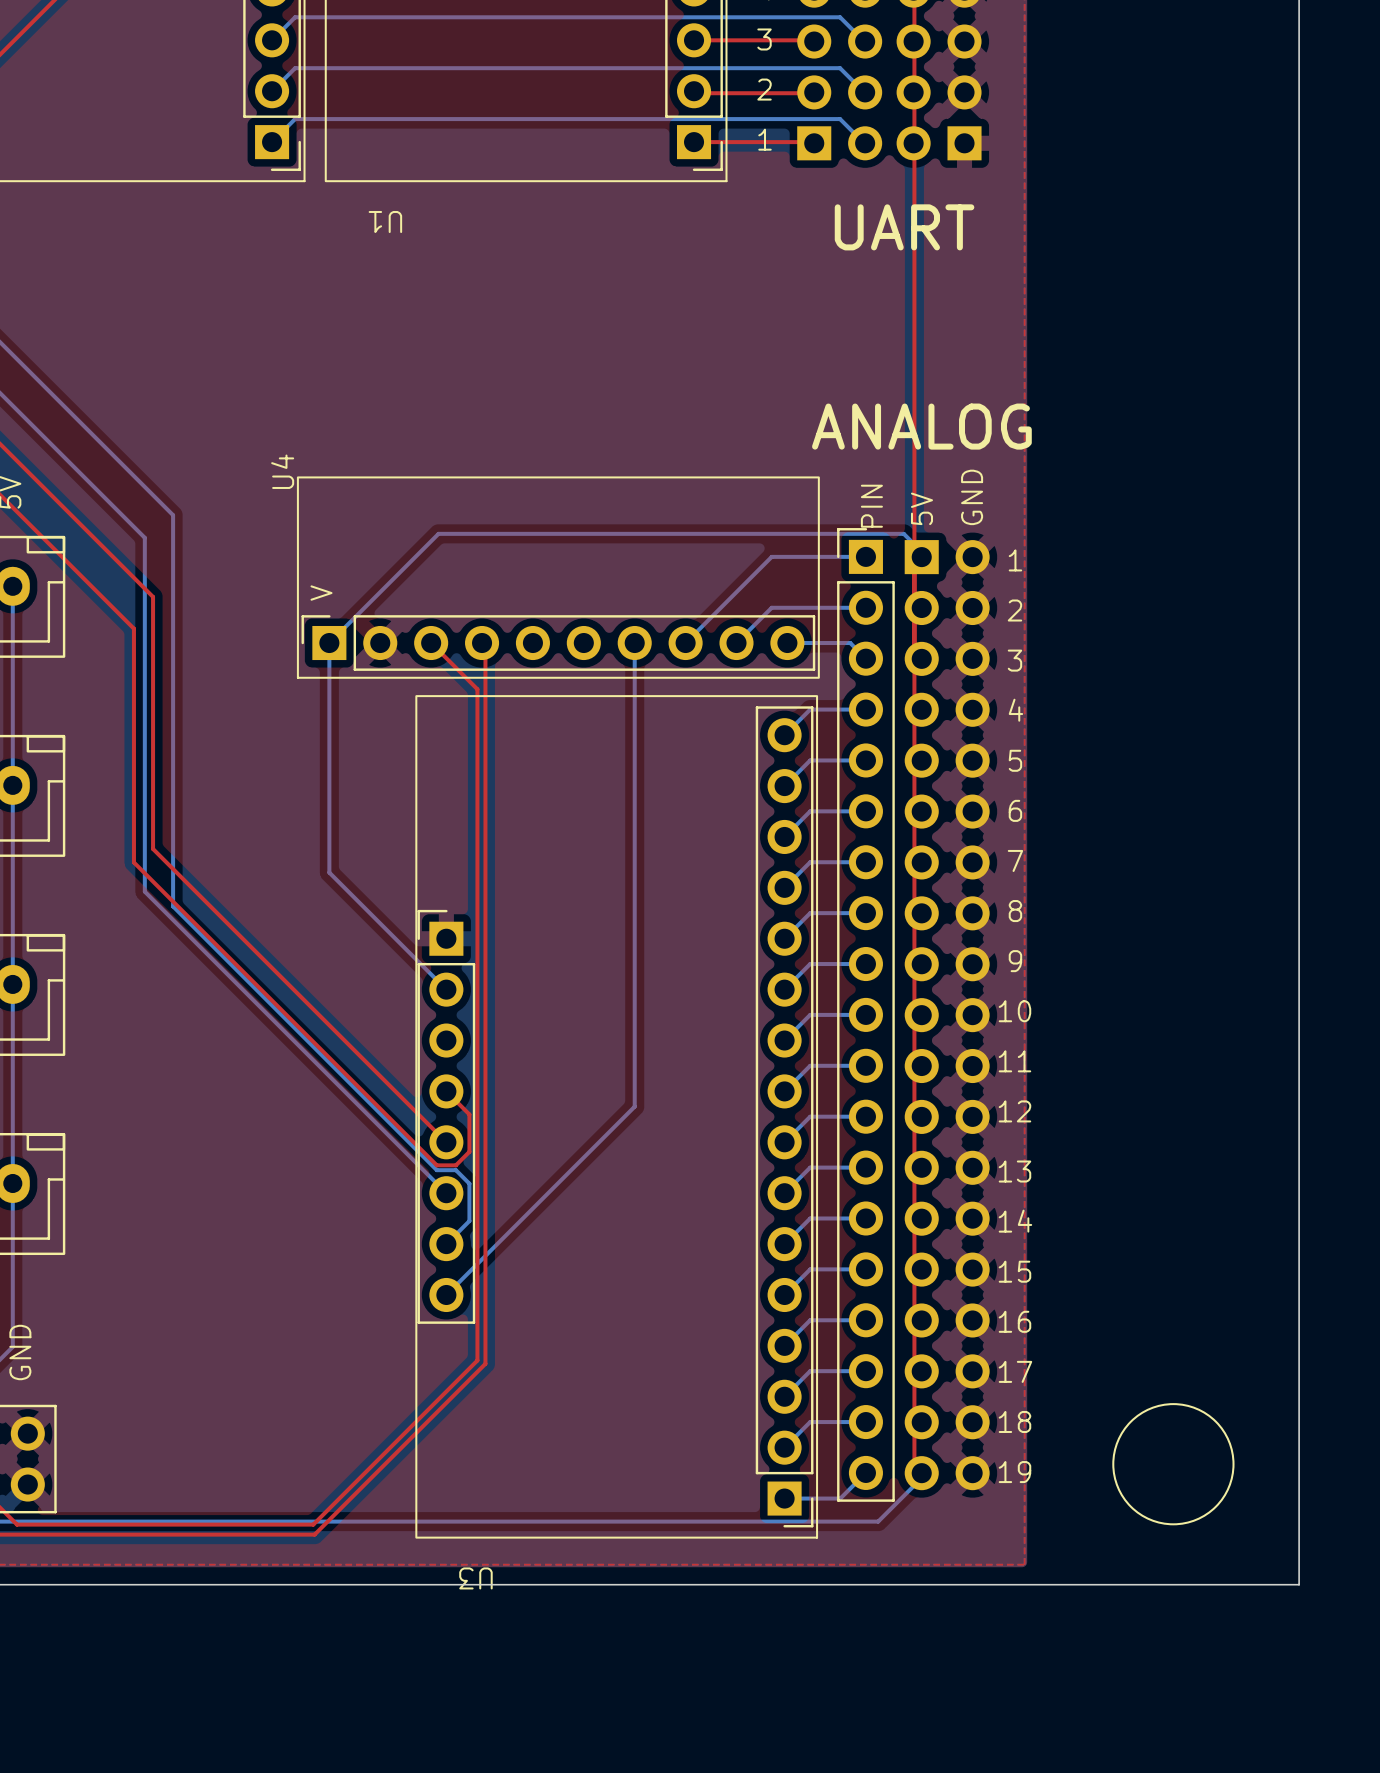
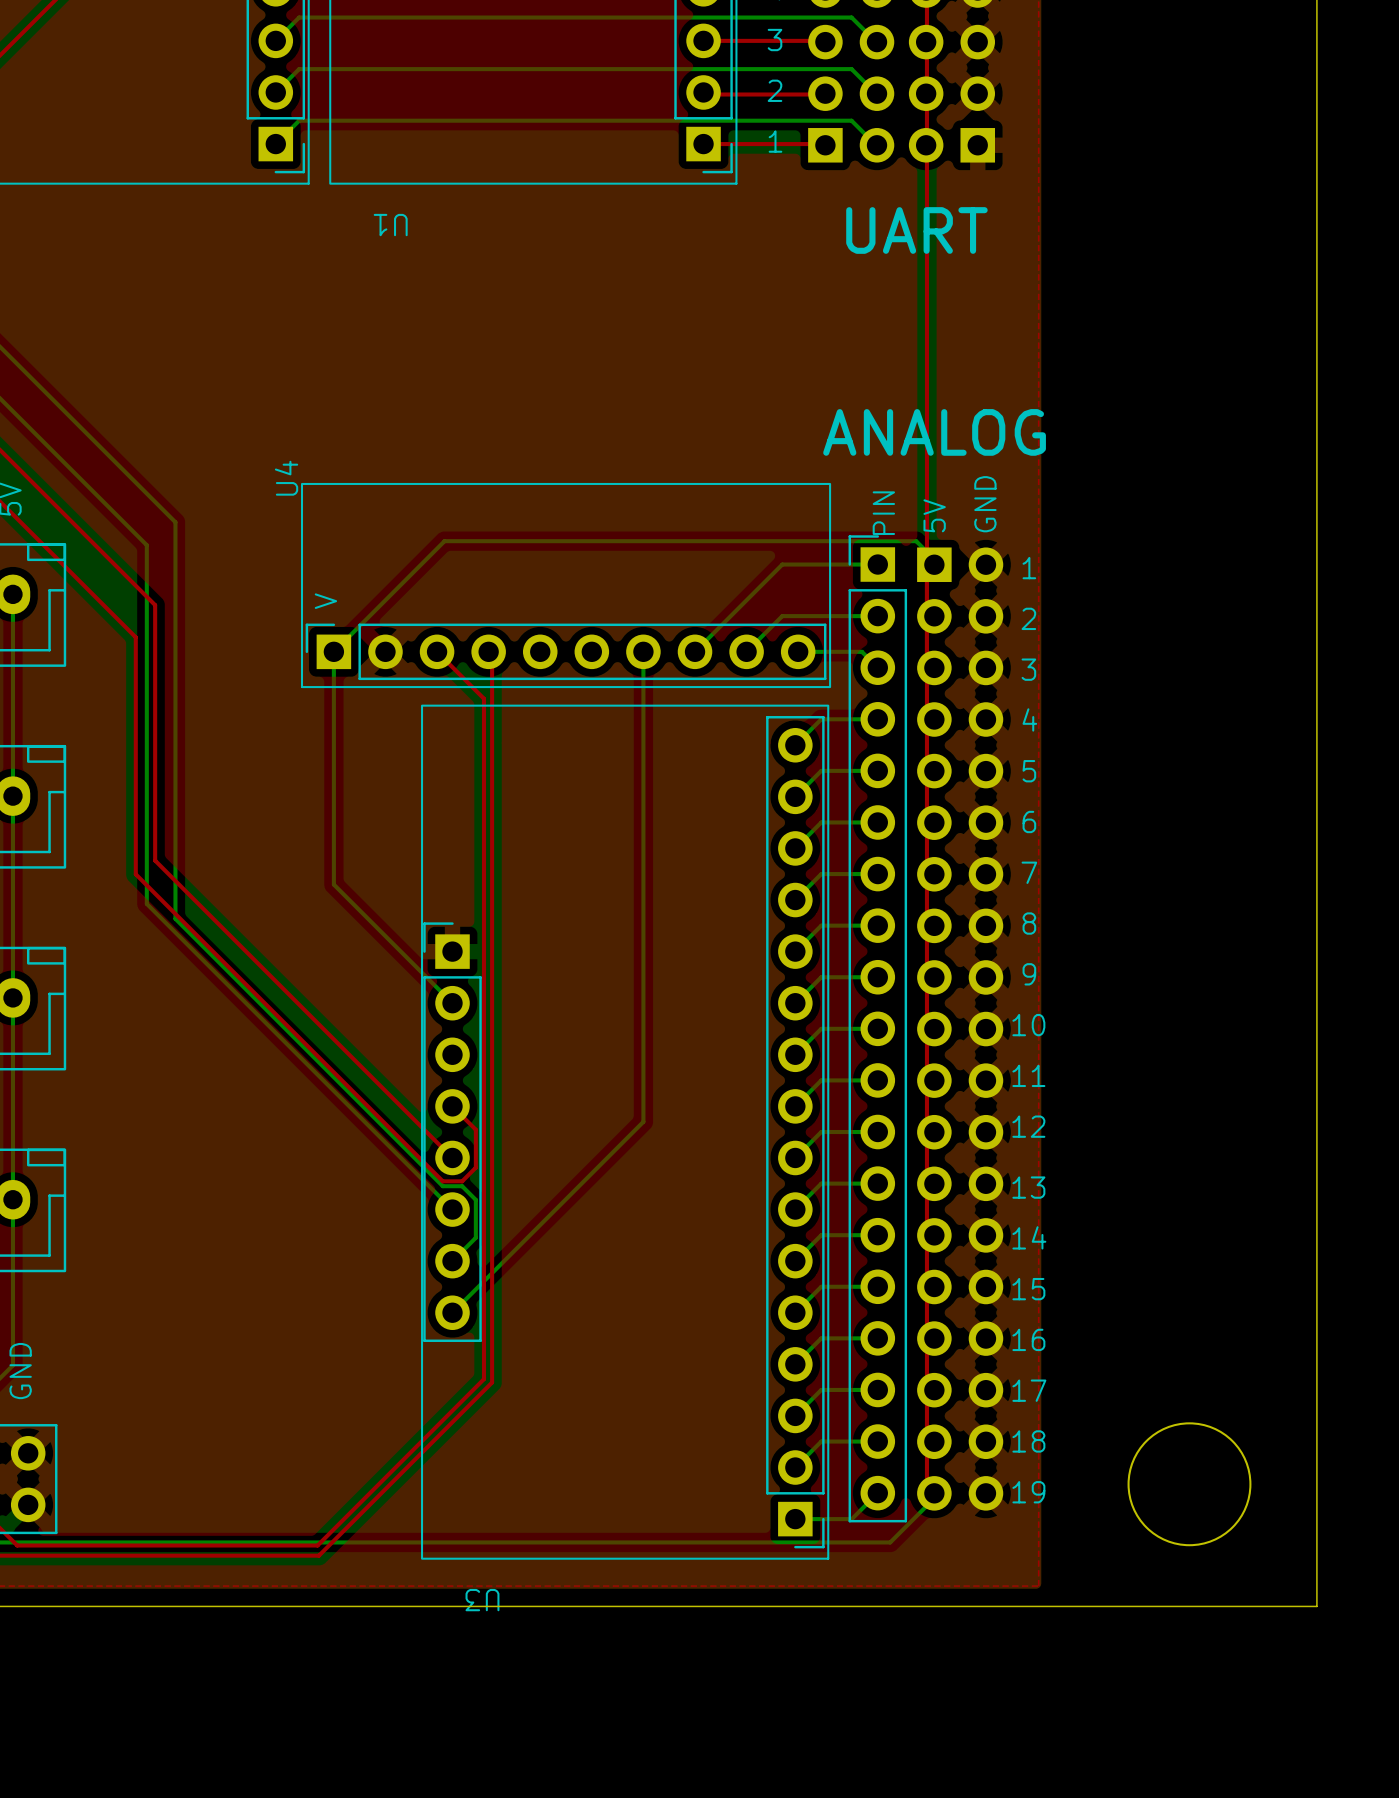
drawing: [1112, 1403, 1235, 1526] -> none
round board edge: none -> [1127, 1422, 1252, 1547]

